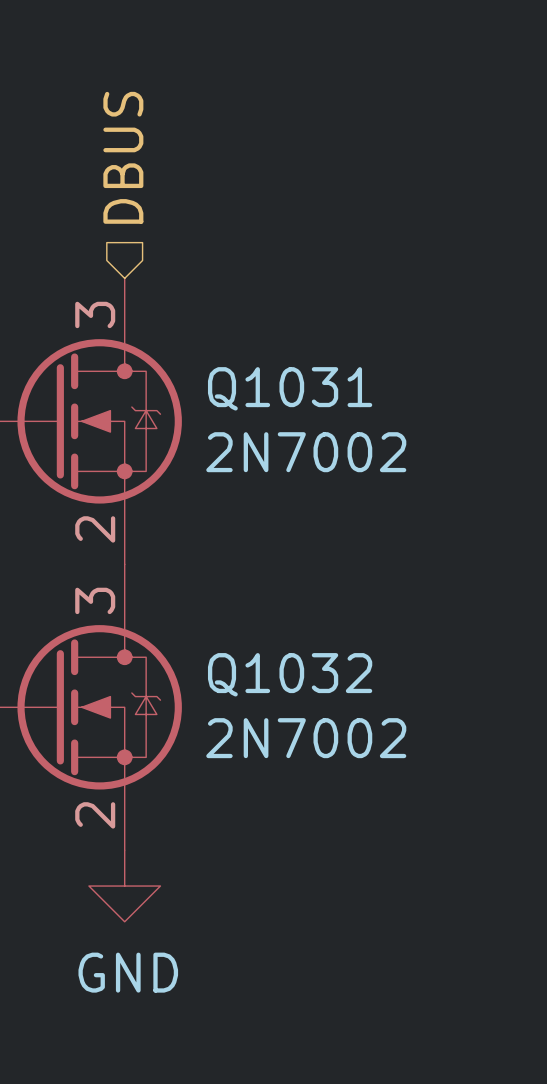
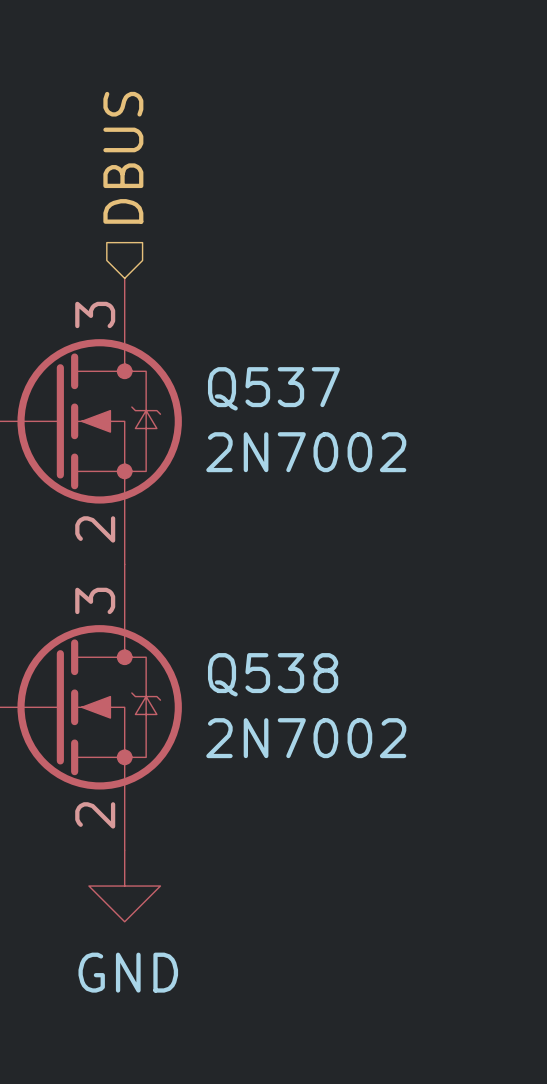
Q1031 name: Q1031 (290, 388) -> Q537 (273, 388)
Q1032 name: Q1032 (290, 674) -> Q538 (273, 674)

